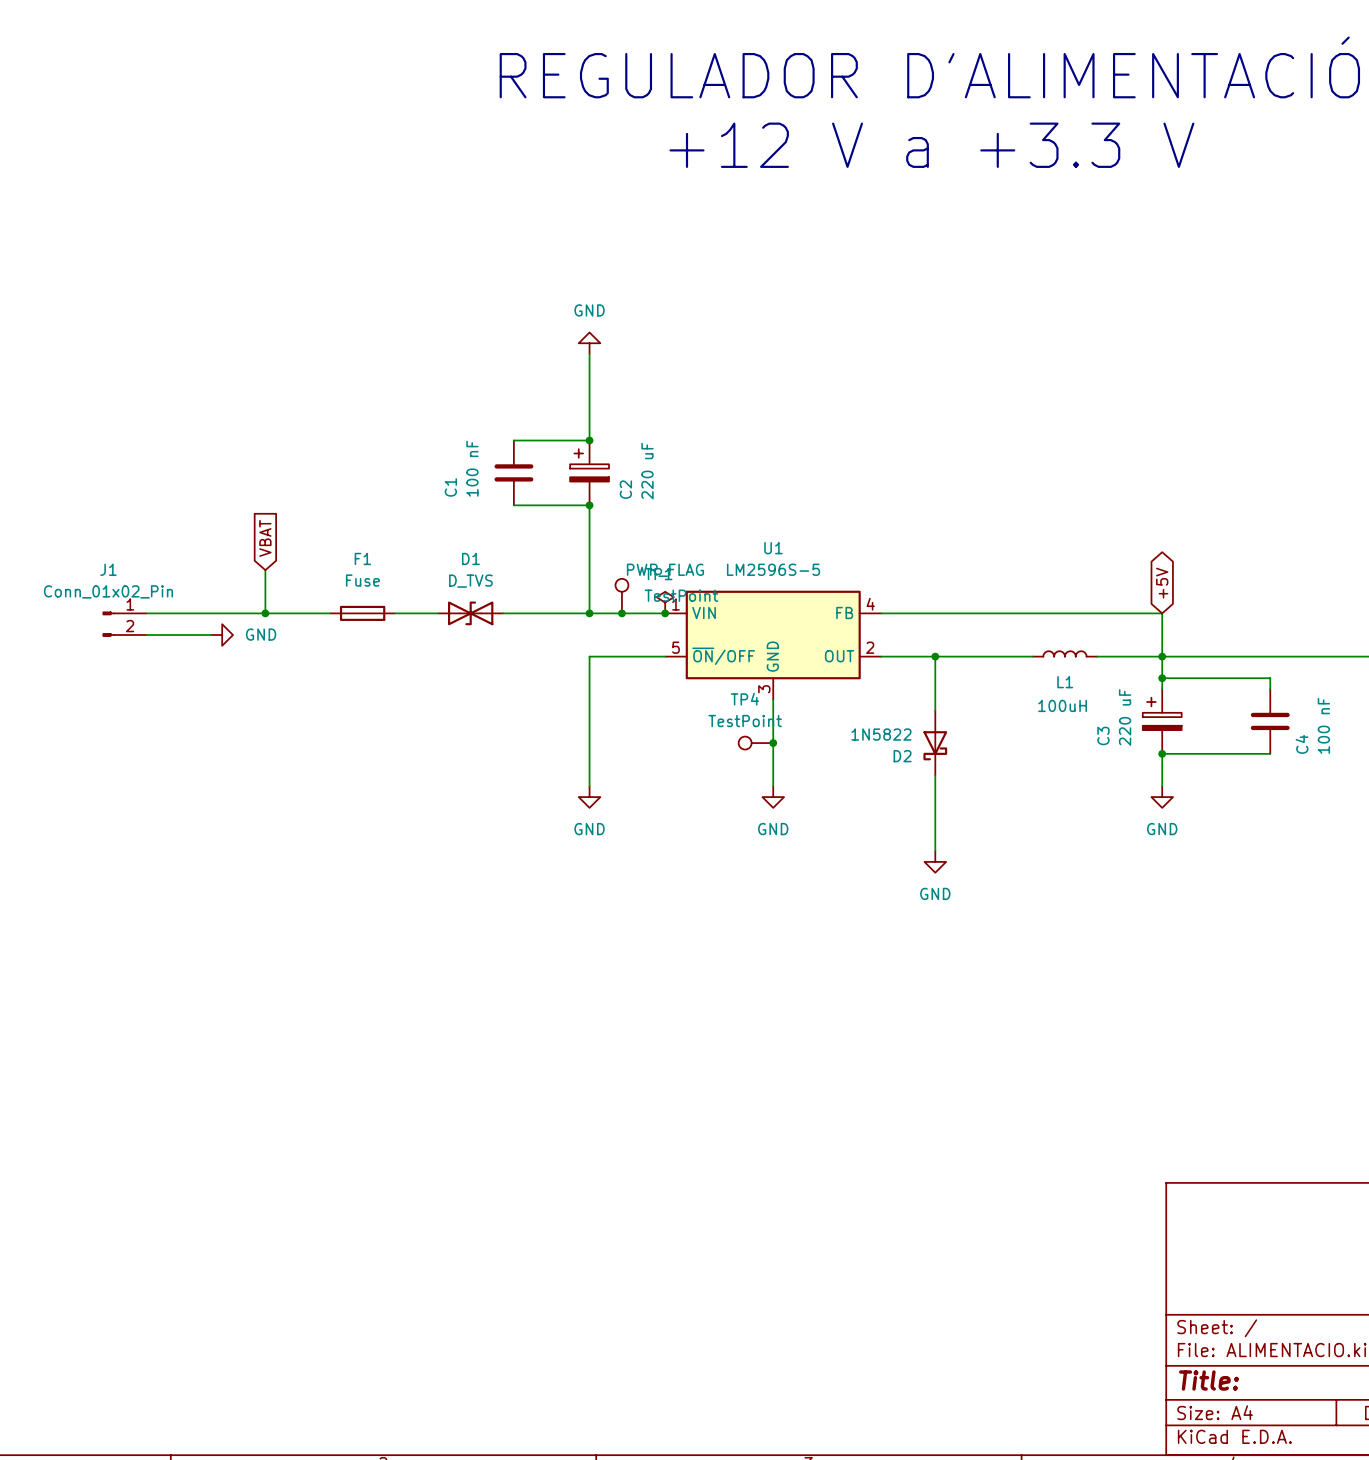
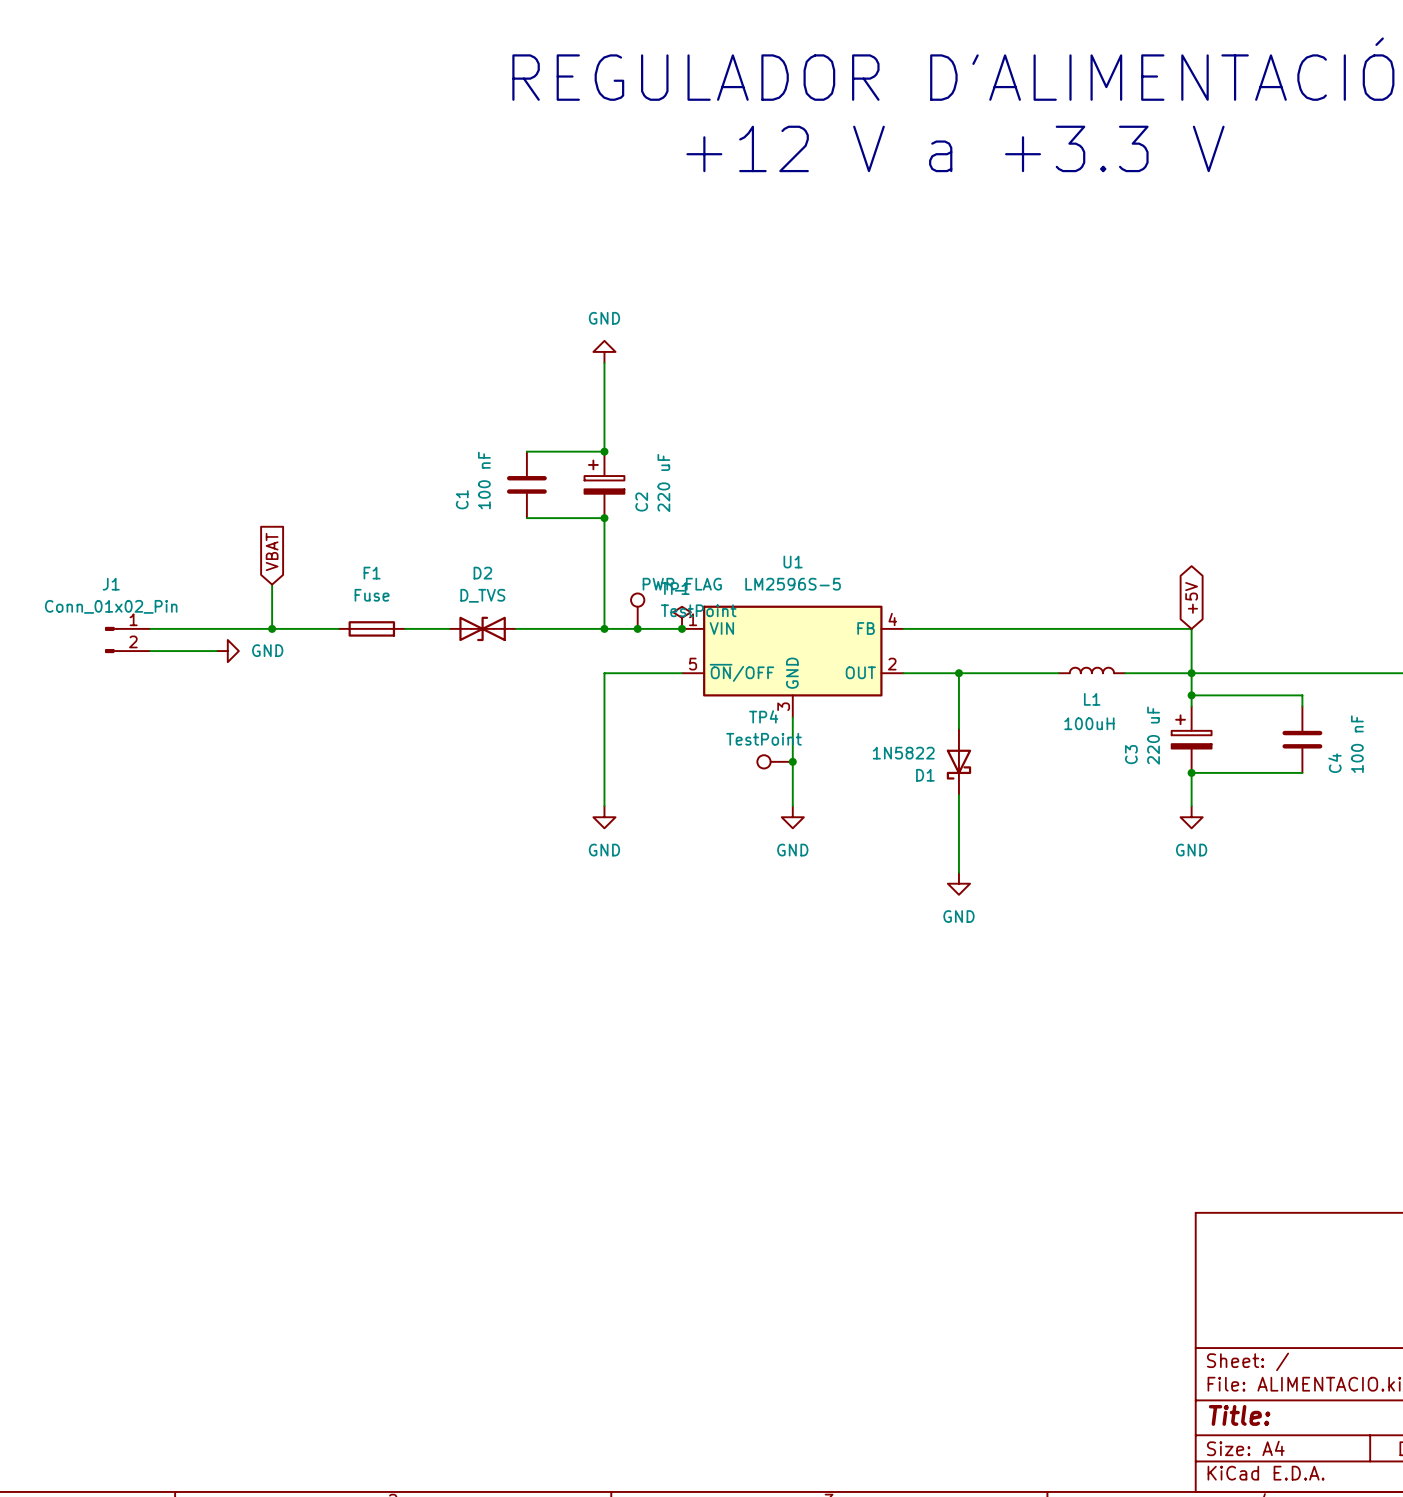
D1 name: D1 (470, 558) -> D2 (482, 573)
D2 name: D2 (902, 756) -> D1 (925, 775)

